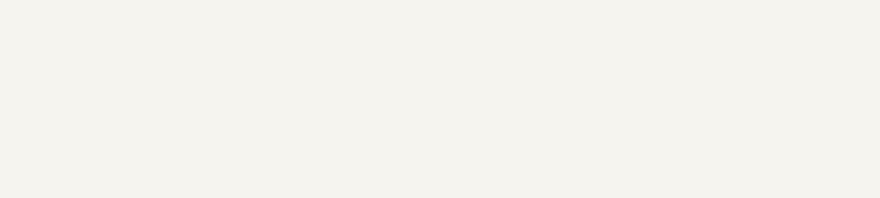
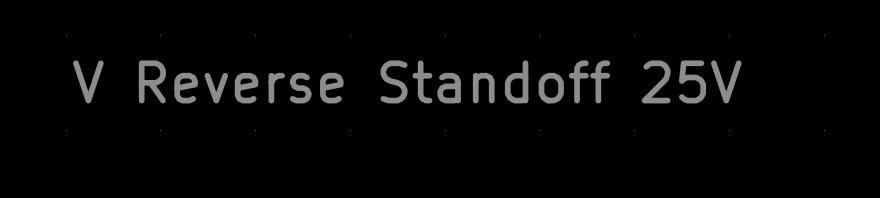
text: none -> V Reverse Standoff 25V (407, 81)

